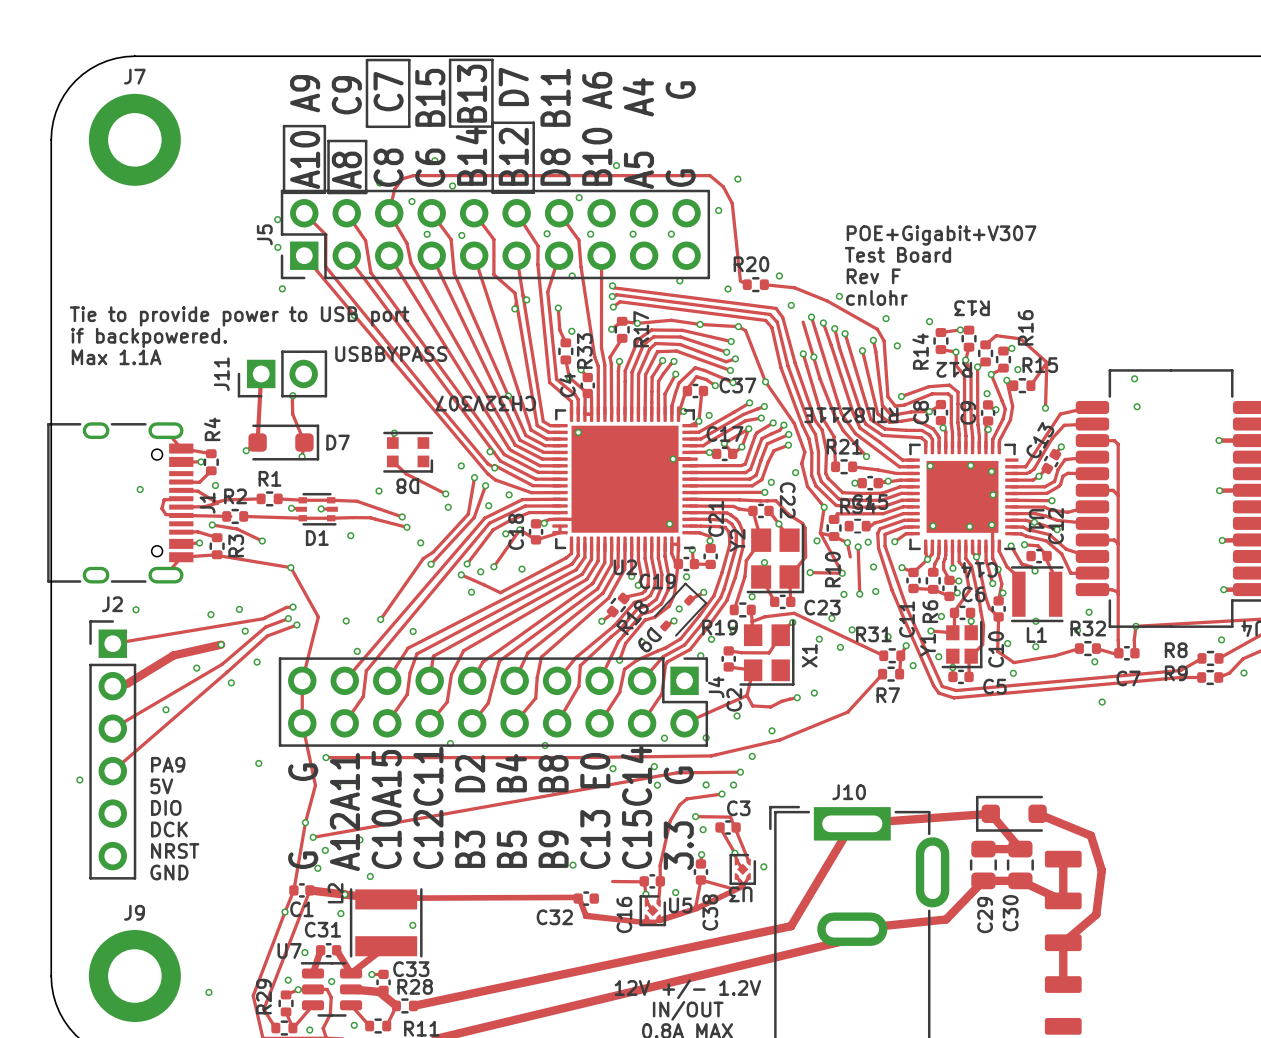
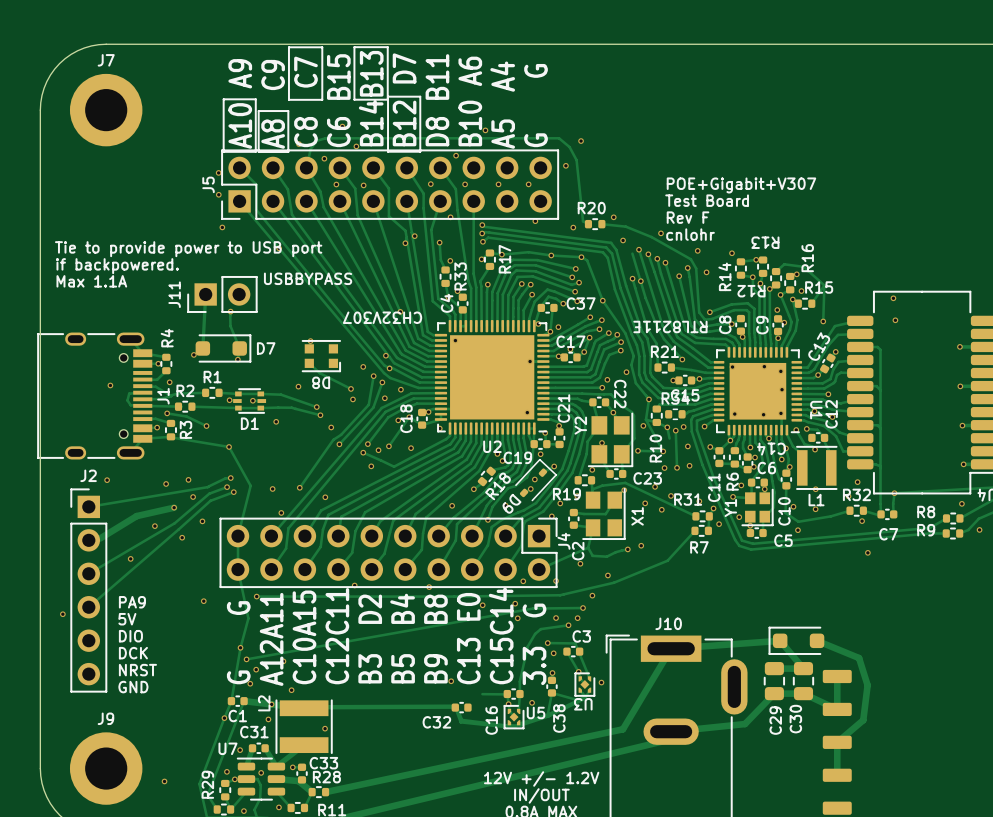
via: none -> (439, 428)
via: none -> (452, 505)

